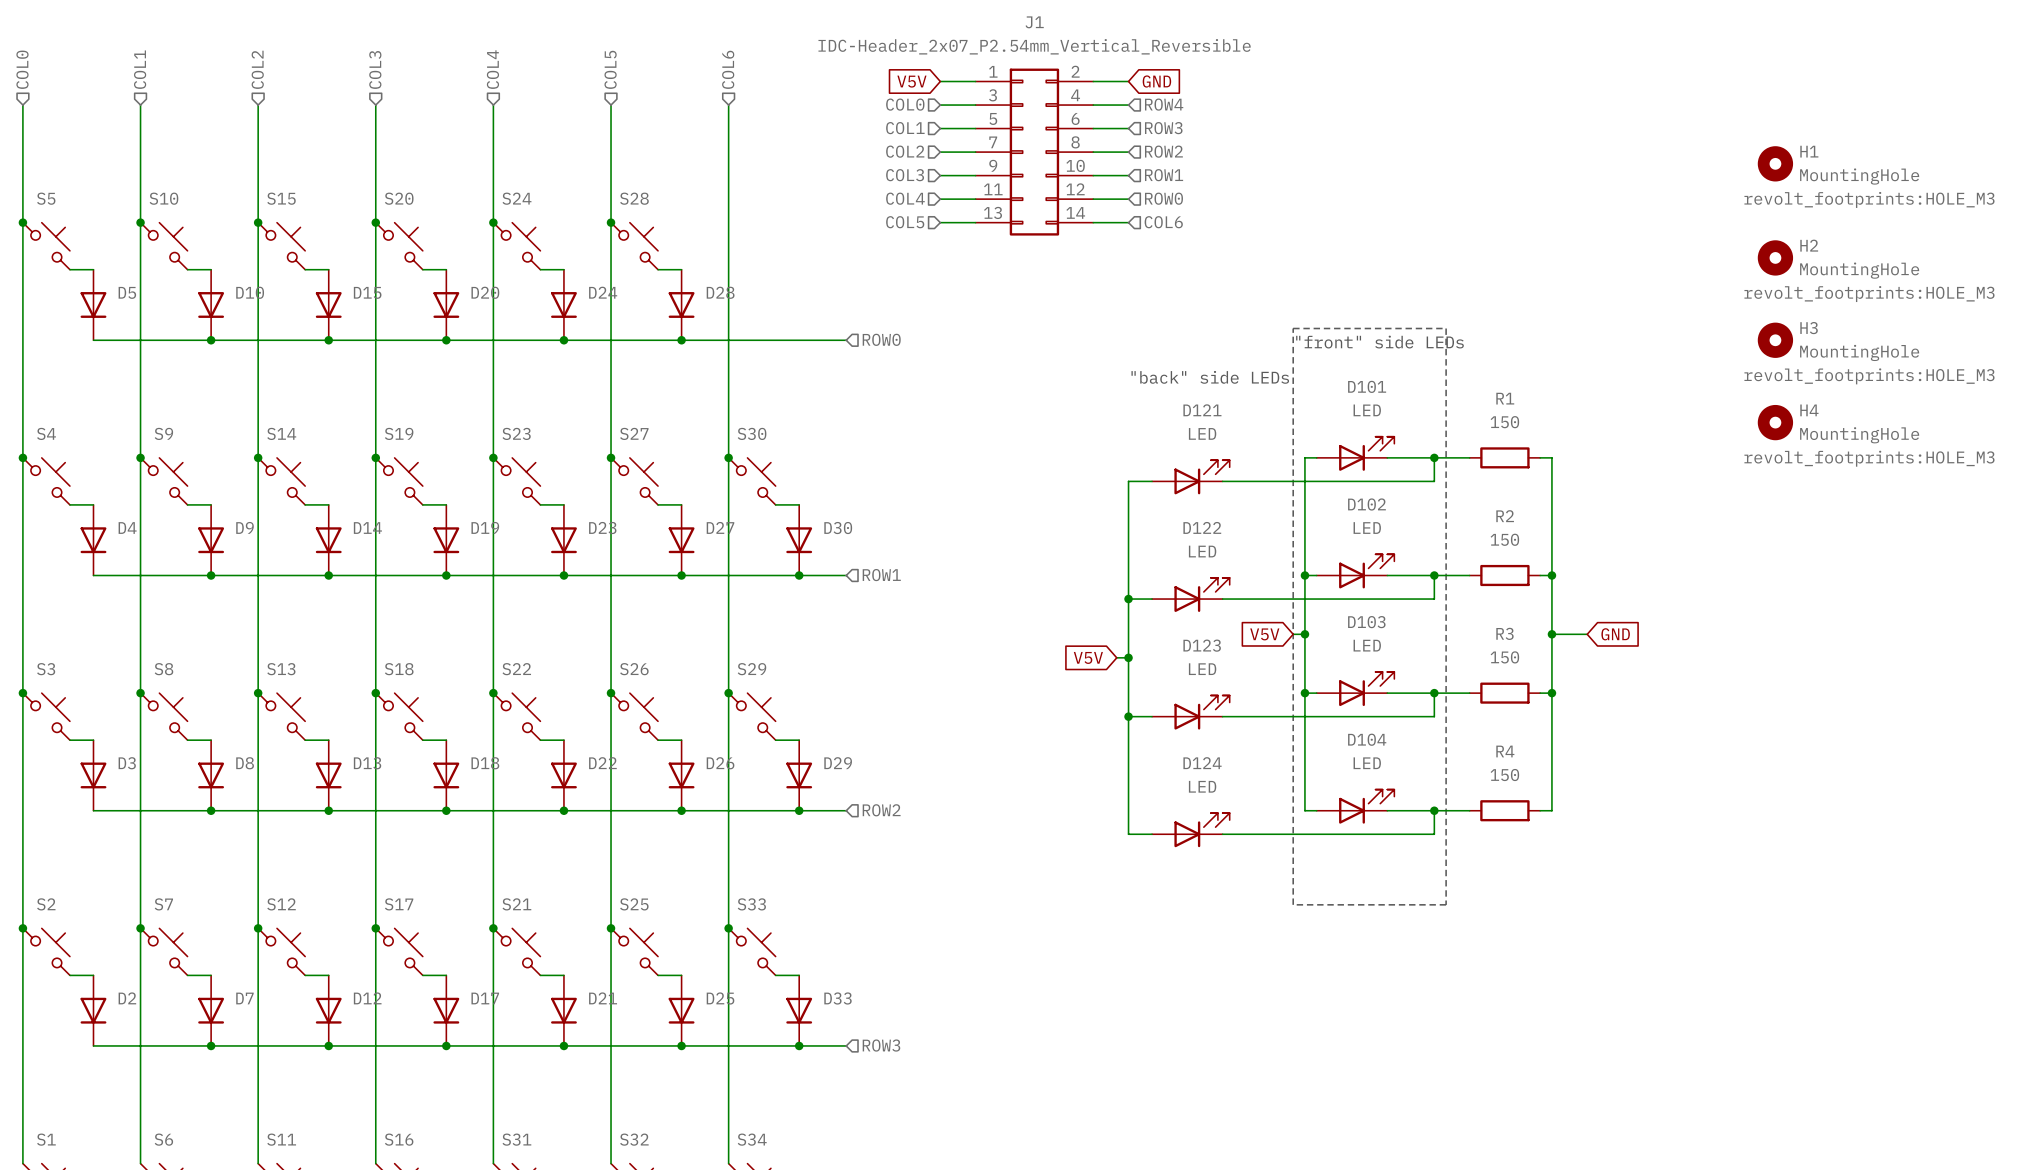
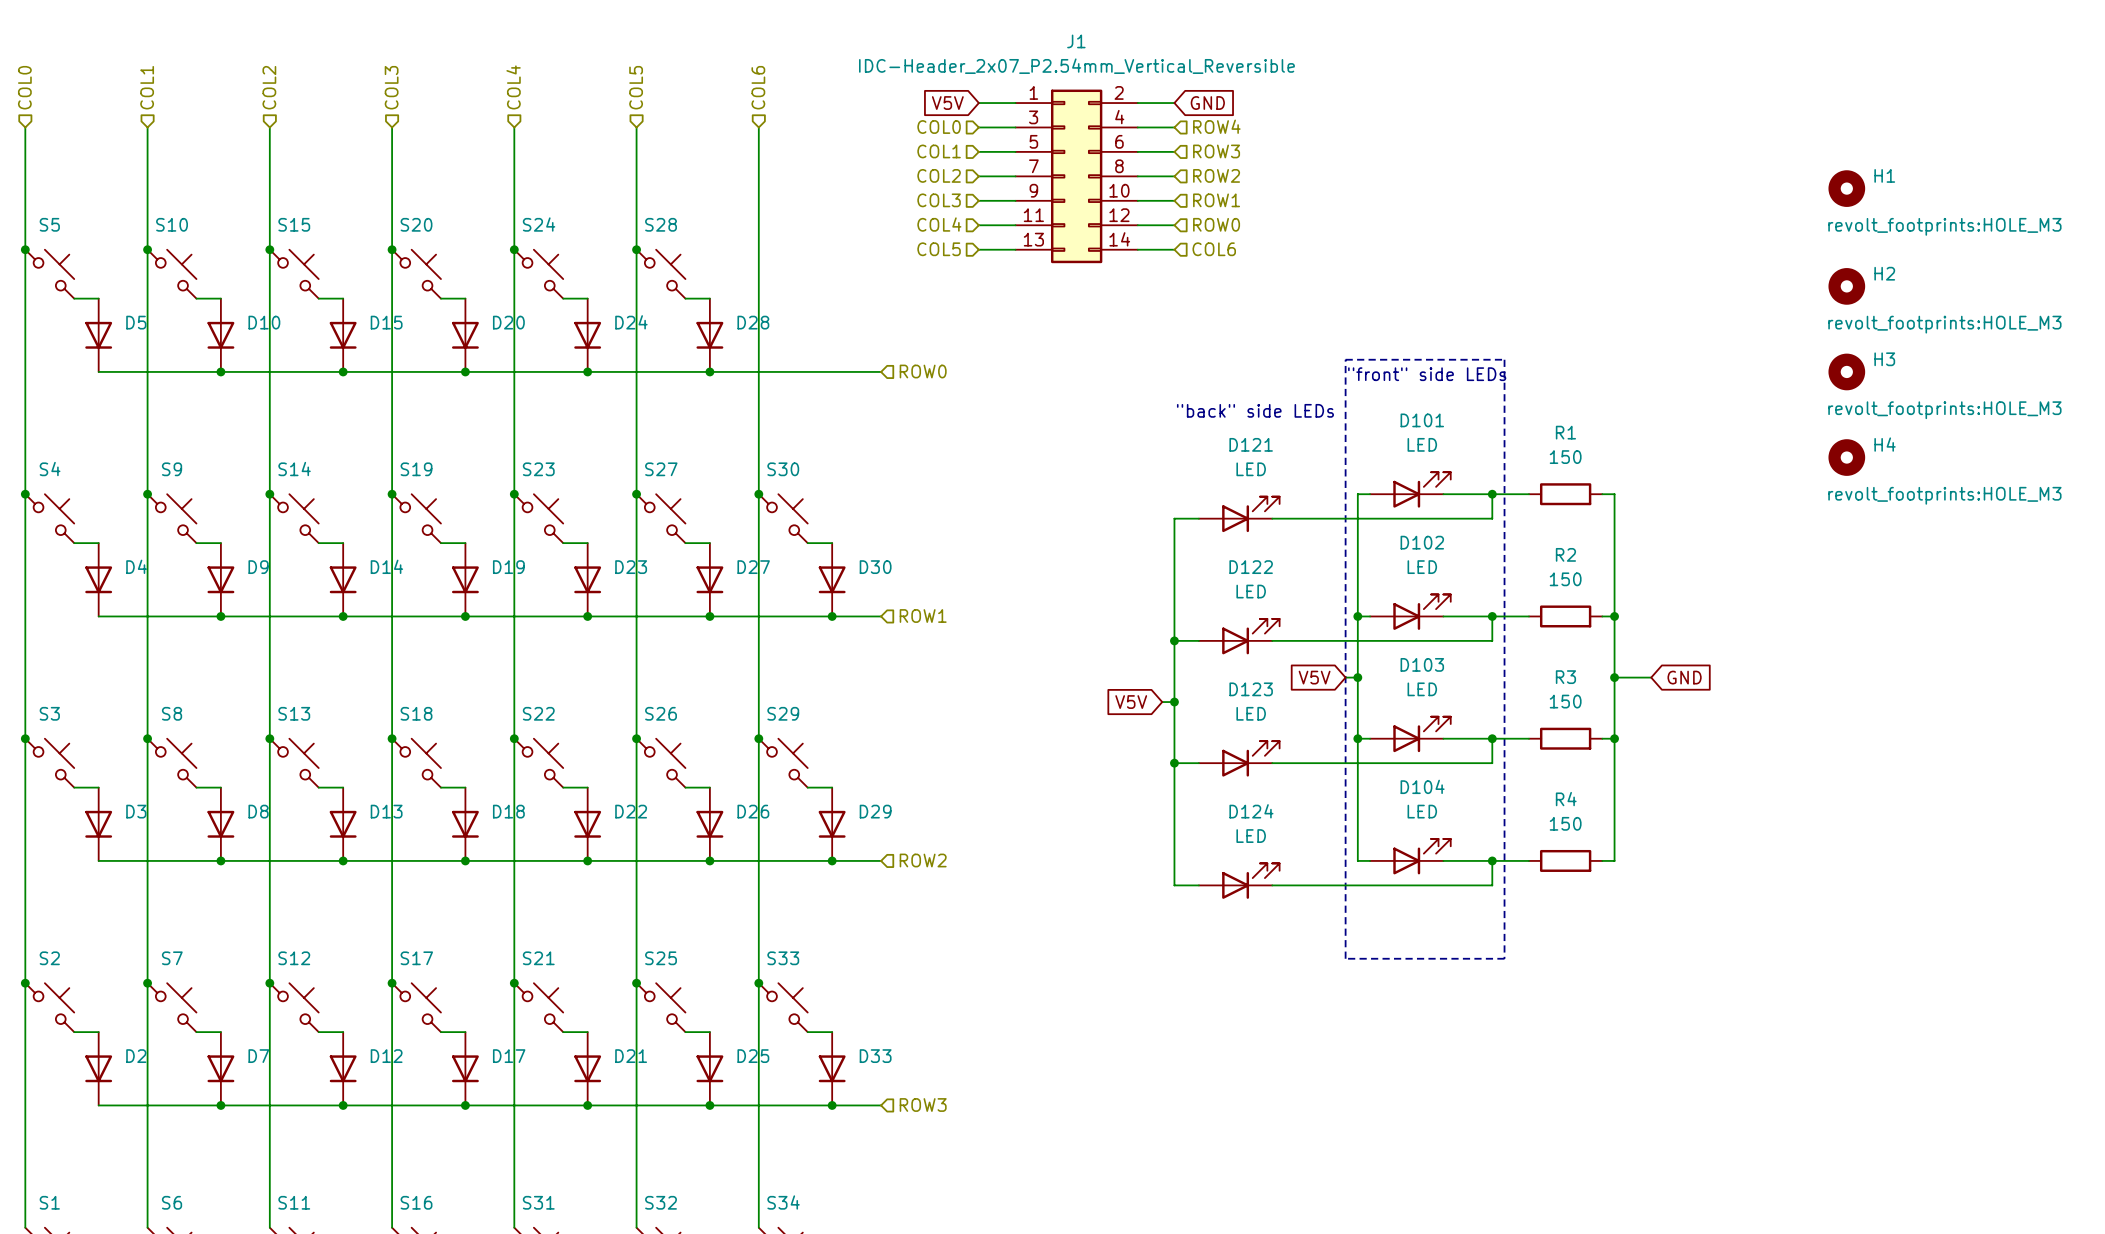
H1 value: MountingHole (1859, 176) -> none
H2 value: MountingHole (1859, 270) -> none
H3 value: MountingHole (1859, 352) -> none
H4 value: MountingHole (1859, 435) -> none

